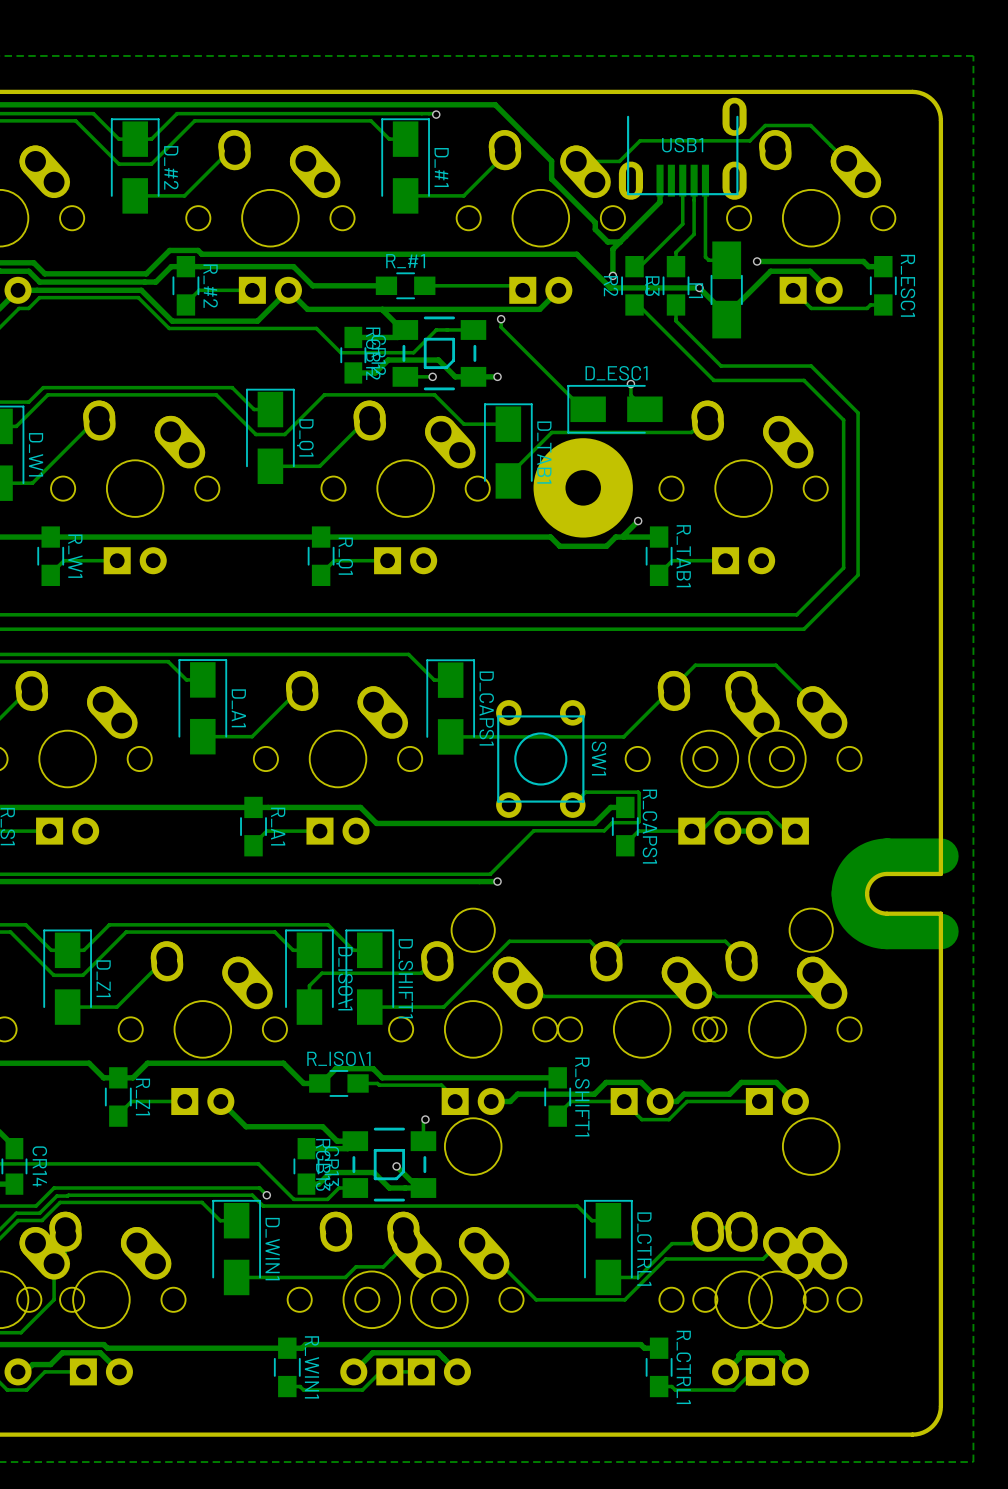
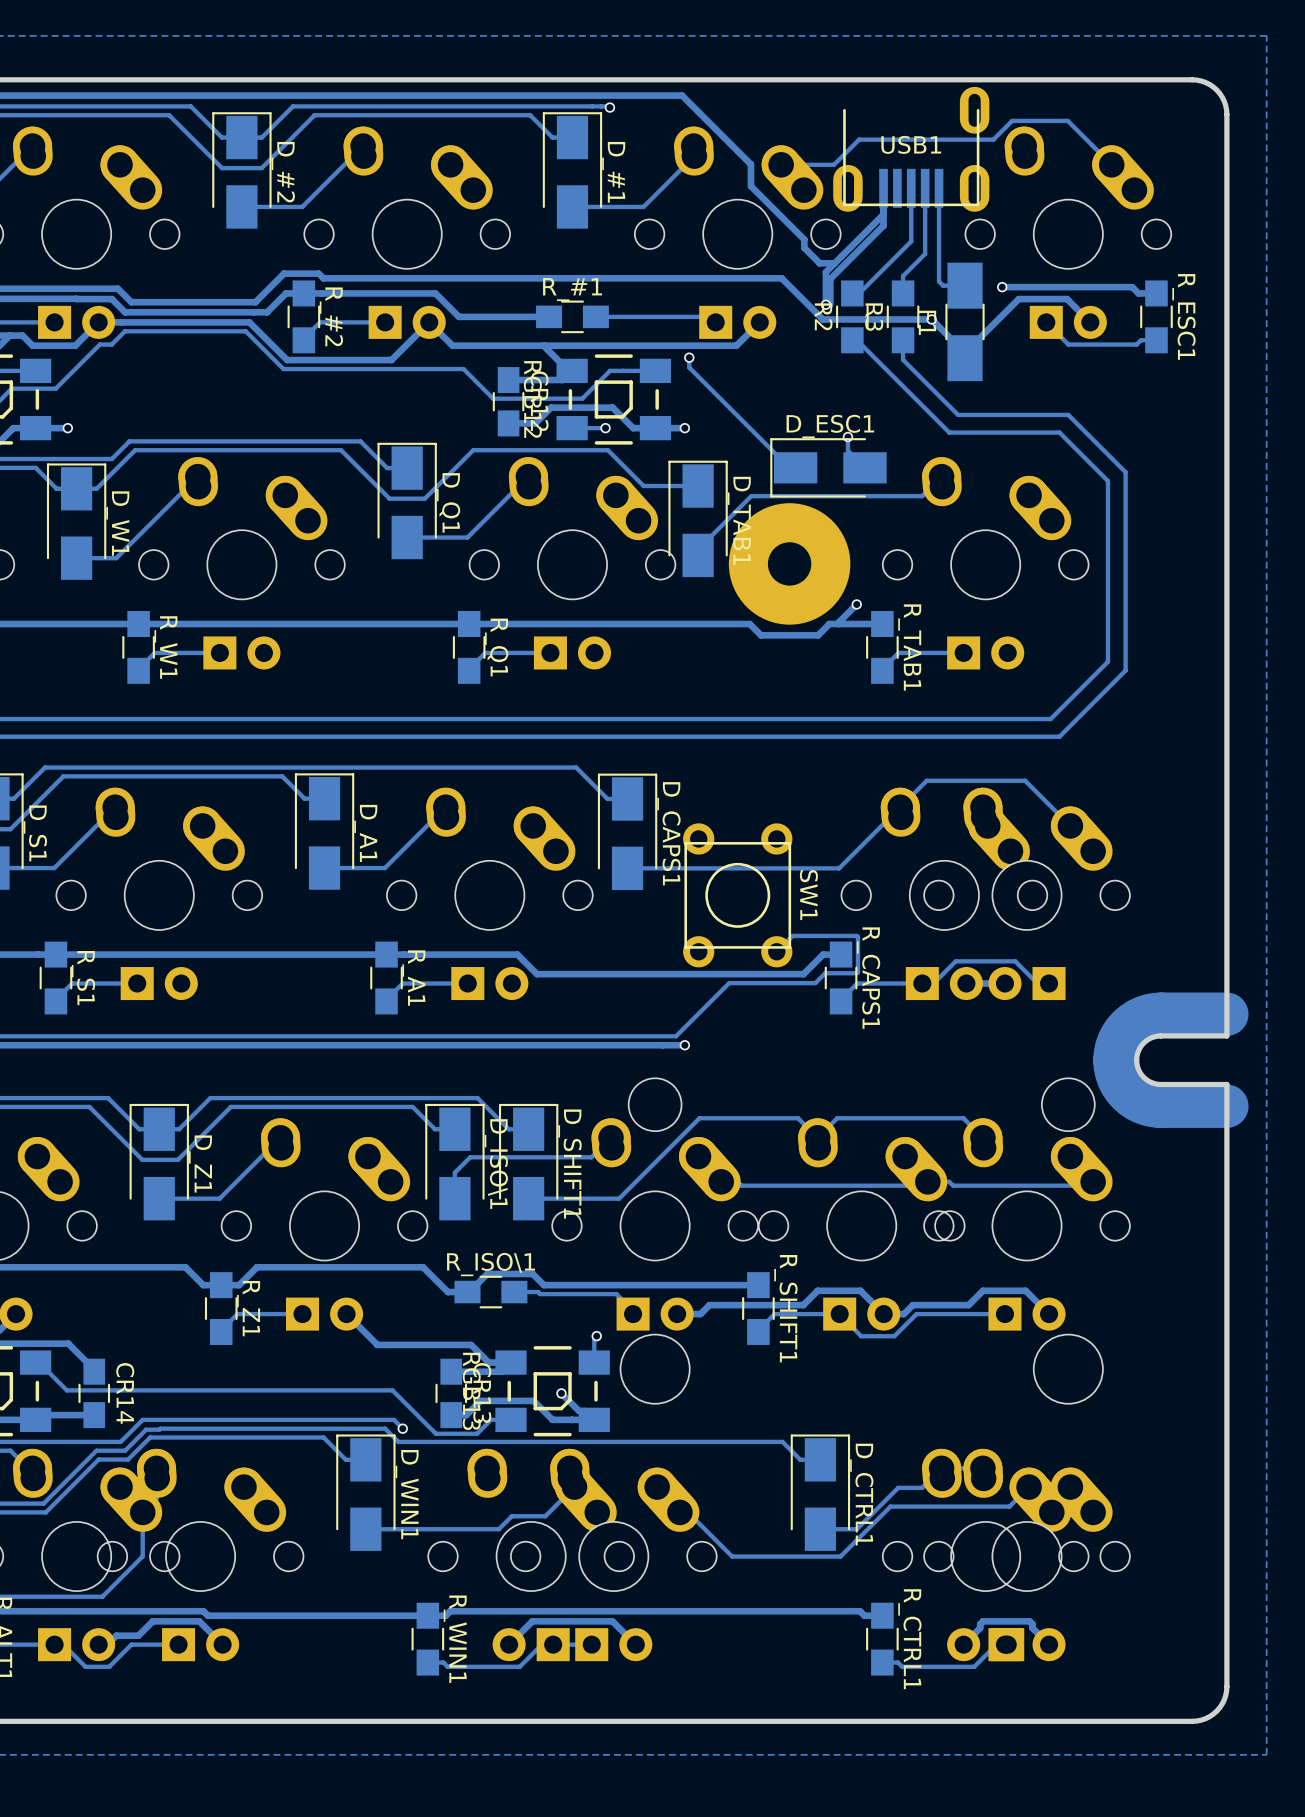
track: none -> (883, 214) (883, 225) (830, 278) (830, 304)

